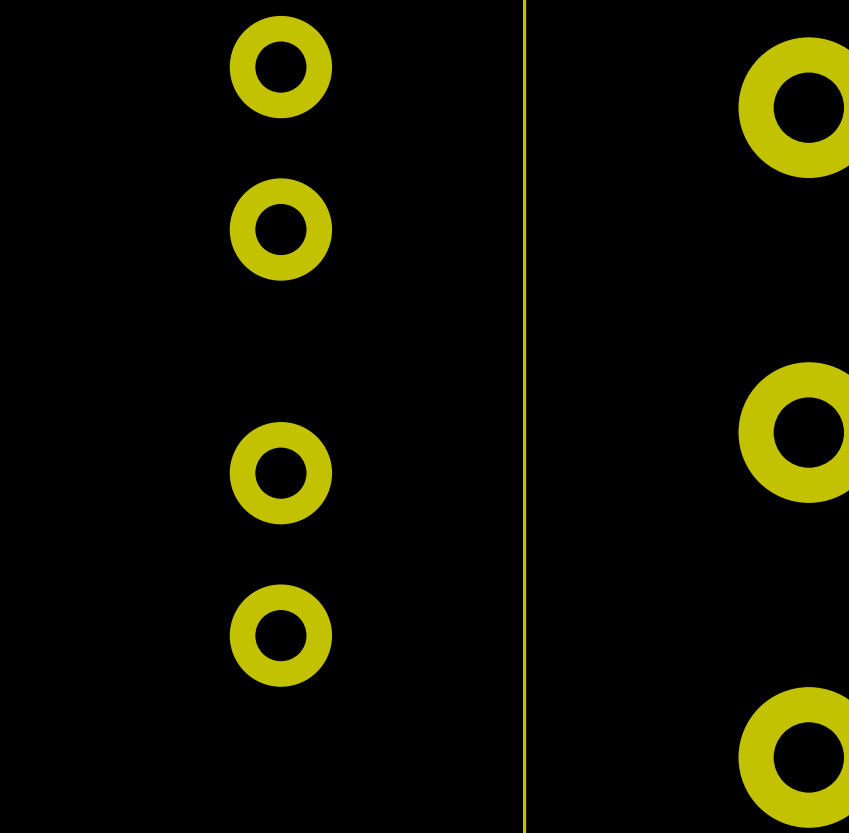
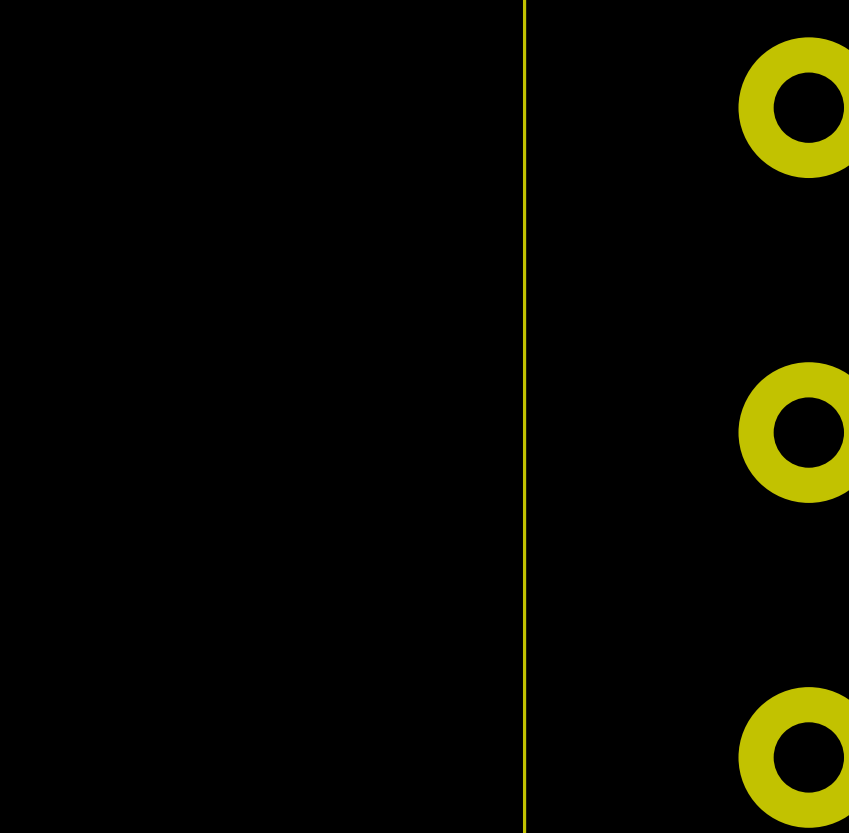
part: (280, 148) -> none
part: (280, 554) -> none

